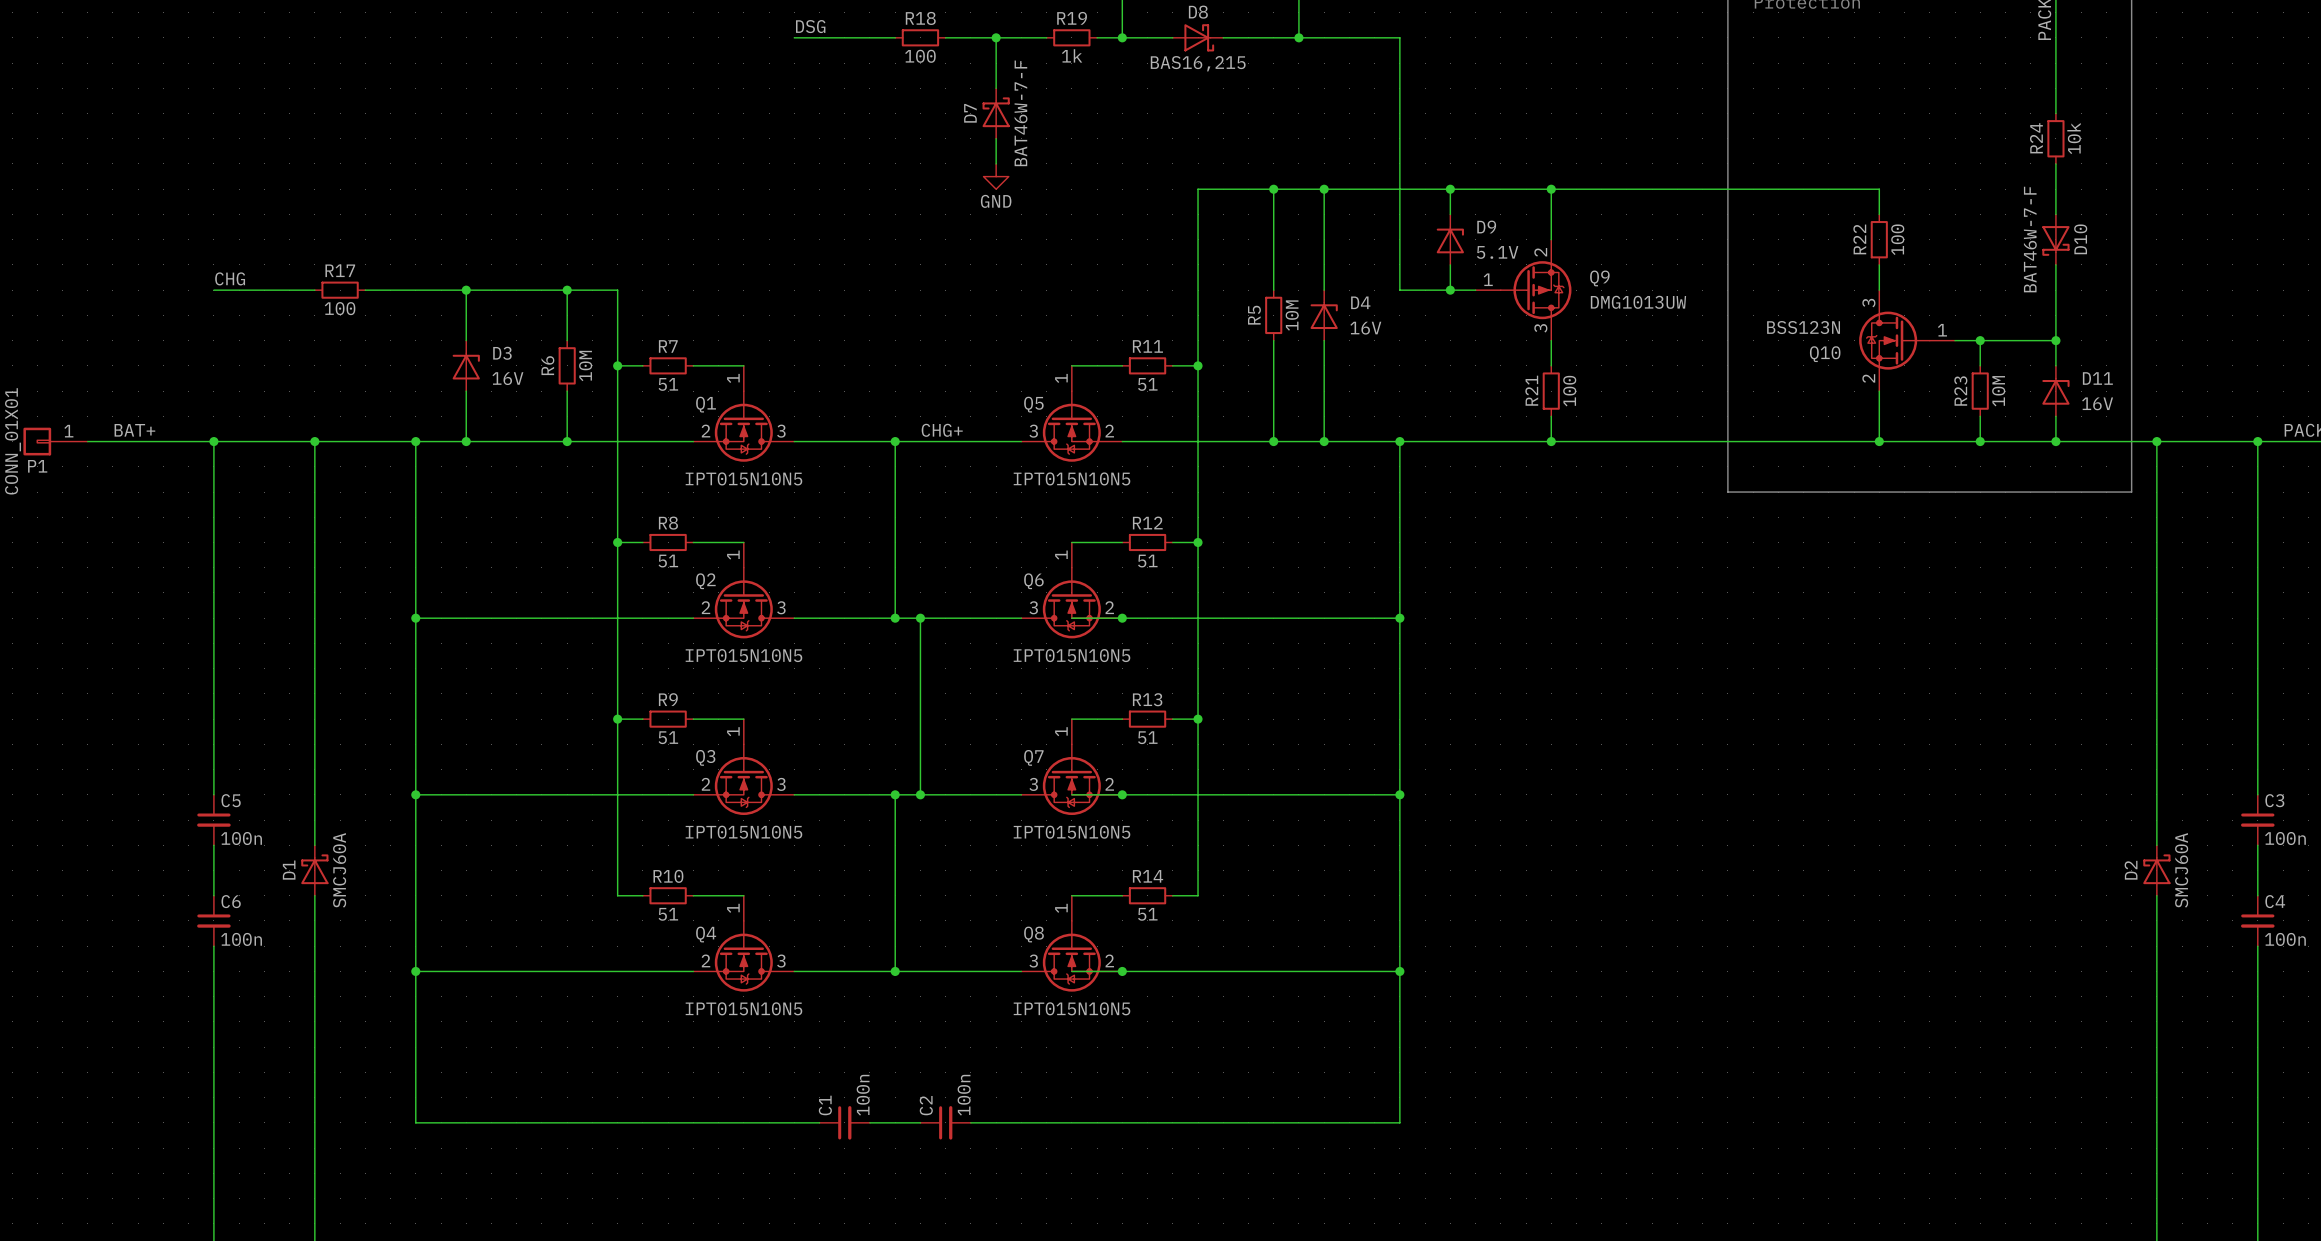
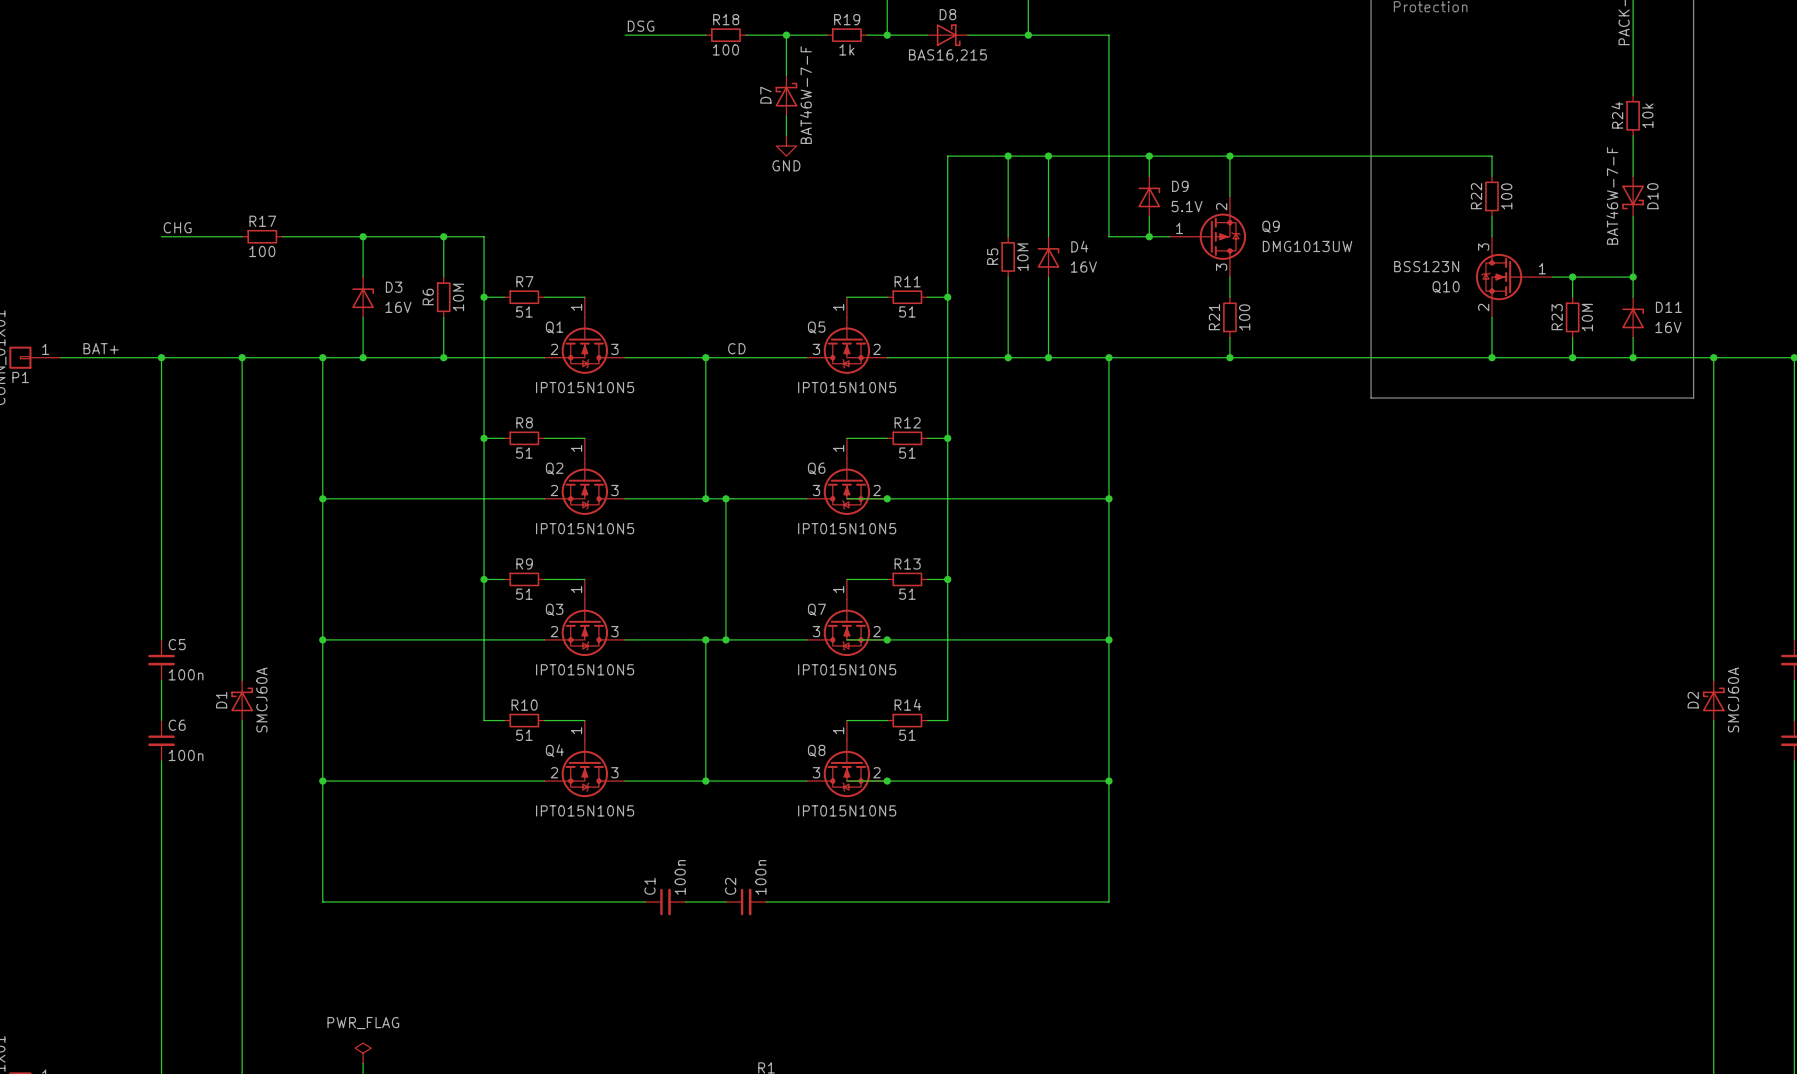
label: CHG+ (942, 430) -> CD (736, 348)

